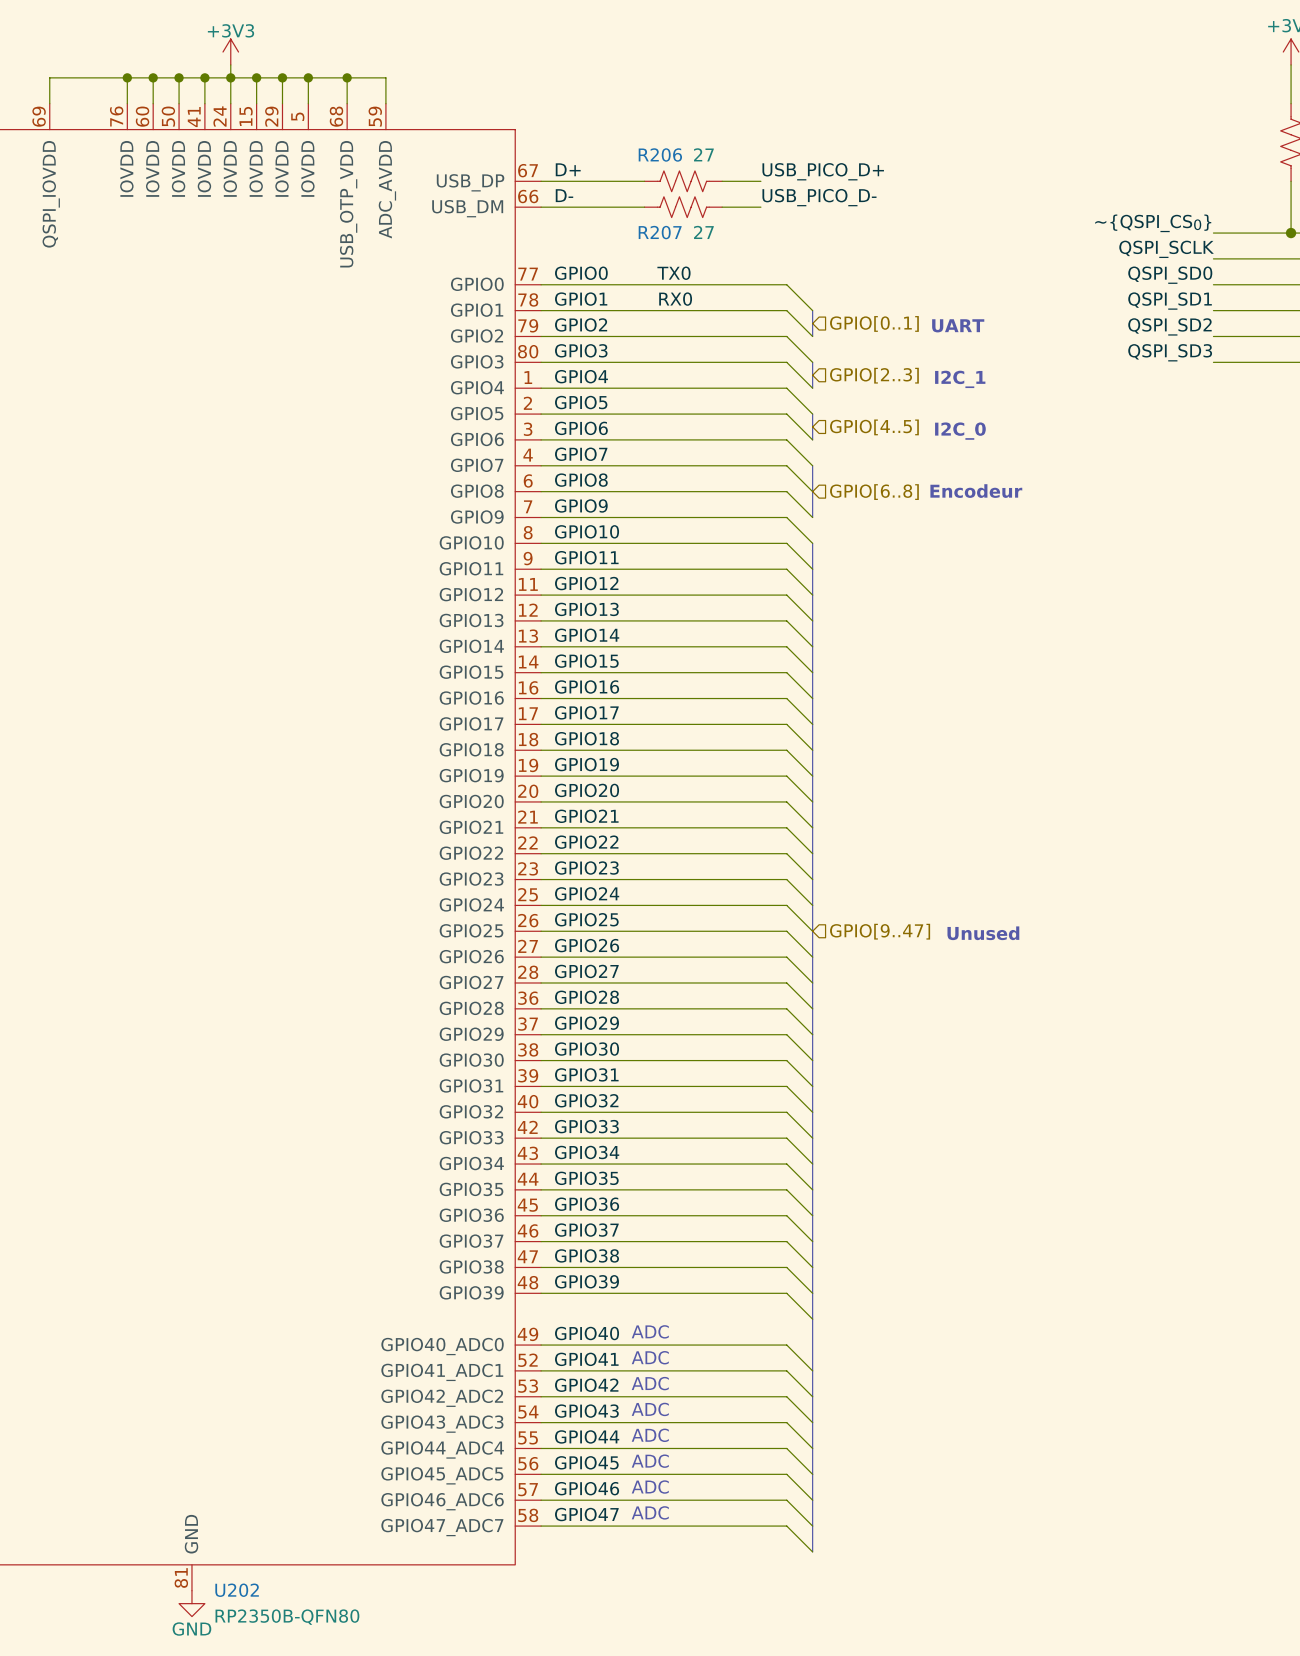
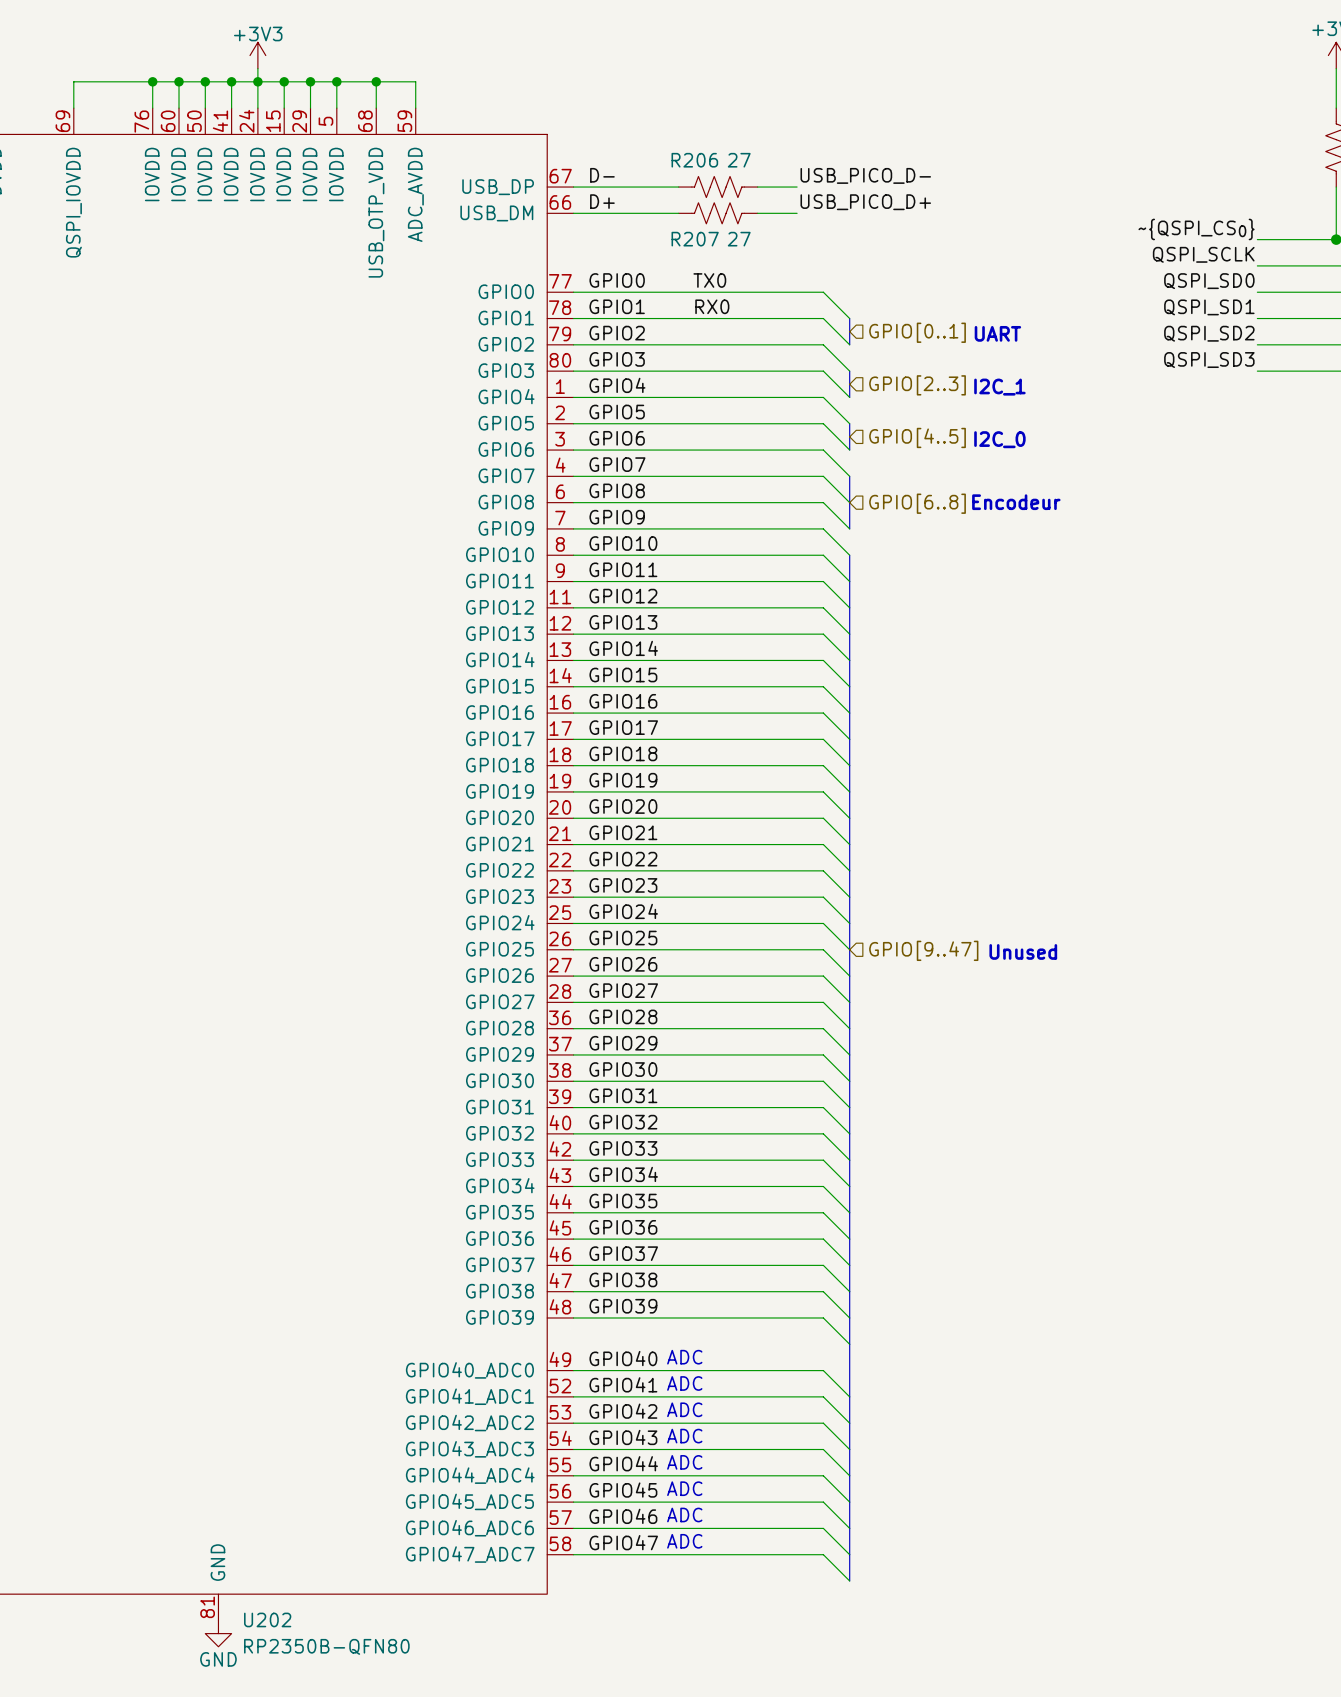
label: D+ (568, 169) -> D- (602, 175)
label: USB_PICO_D+ (823, 171) -> USB_PICO_D- (865, 175)
label: D- (564, 195) -> D+ (602, 201)
label: USB_PICO_D- (819, 197) -> USB_PICO_D+ (865, 202)

